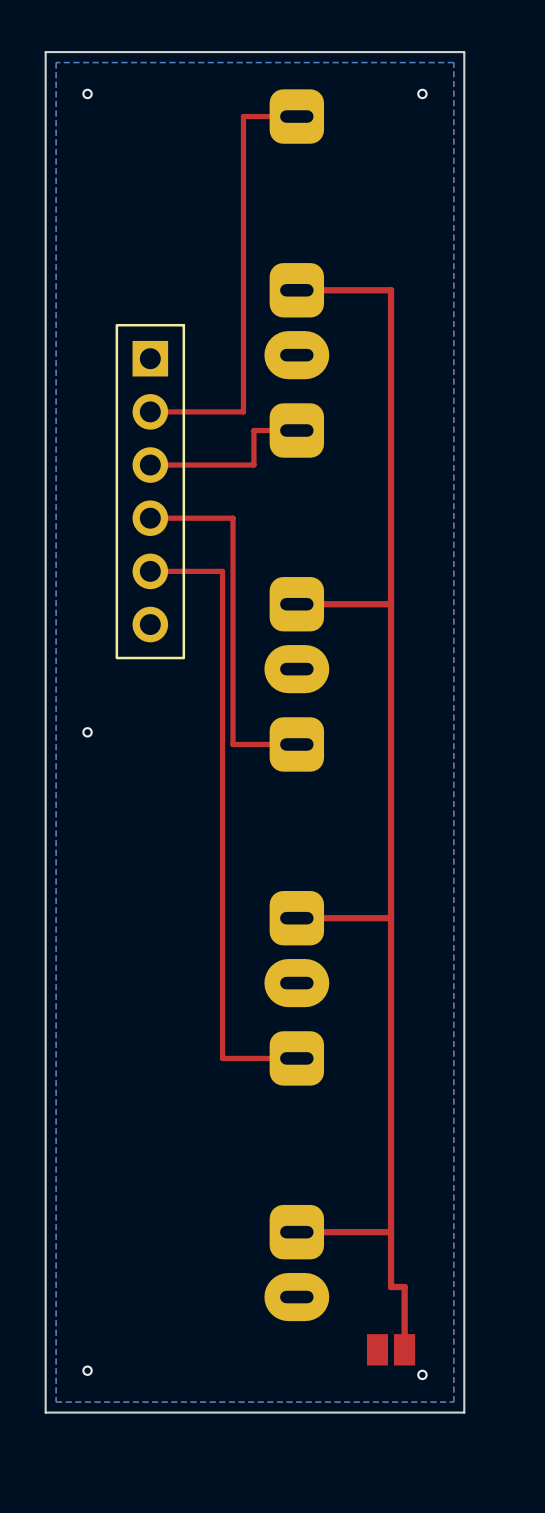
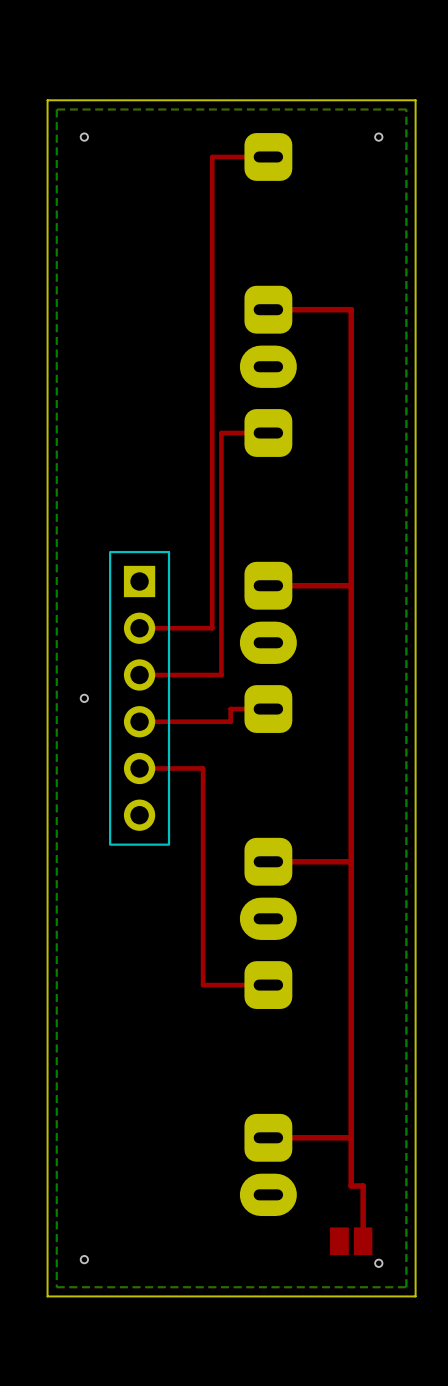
top track: (243, 116) (243, 411) (150, 411) -> (221, 156) (212, 156) (212, 510)
top track: (253, 430) (253, 465) (150, 465) -> (230, 433) (221, 433) (221, 674) (139, 674)
part position: (150, 491) -> (139, 698)
top track: (233, 518) (150, 518) -> (212, 628) (139, 628)
top track: (150, 571) (222, 571) (222, 812) -> (139, 768) (203, 768)
top track: (233, 652) (233, 744) (253, 744) -> (139, 721) (230, 721) (230, 709)

